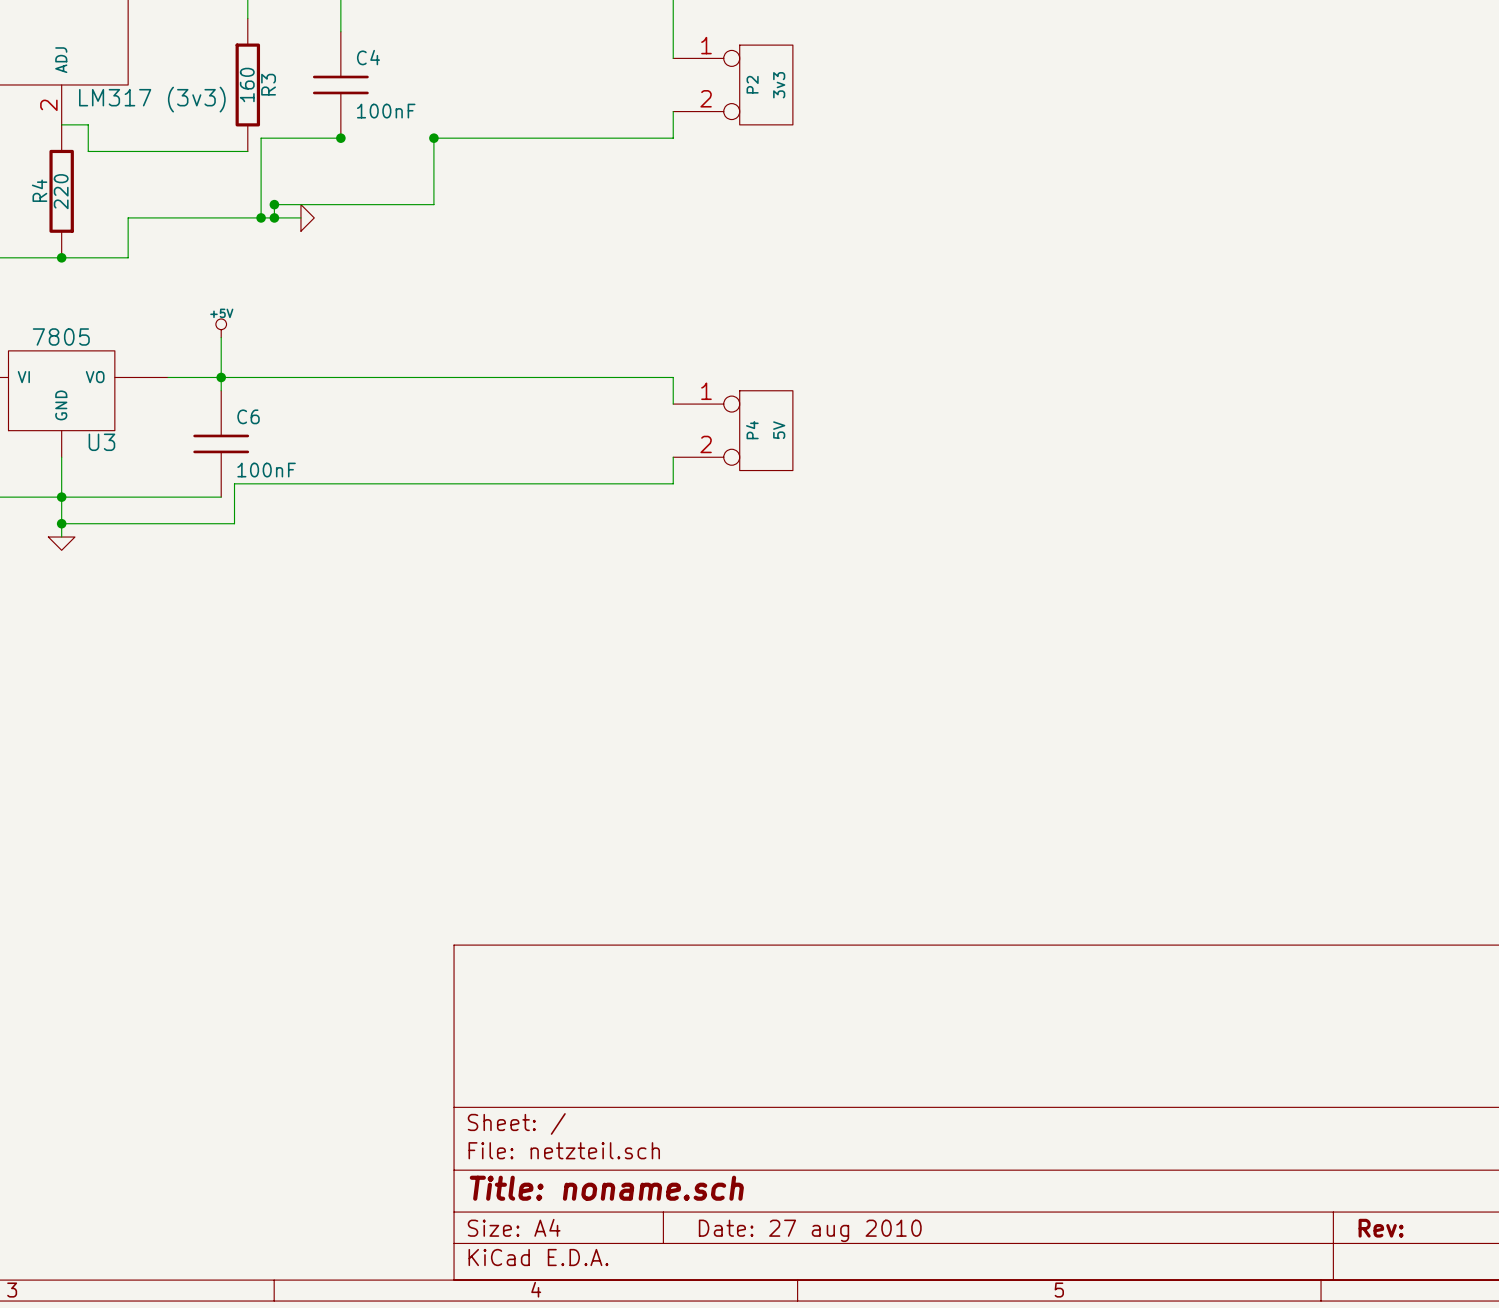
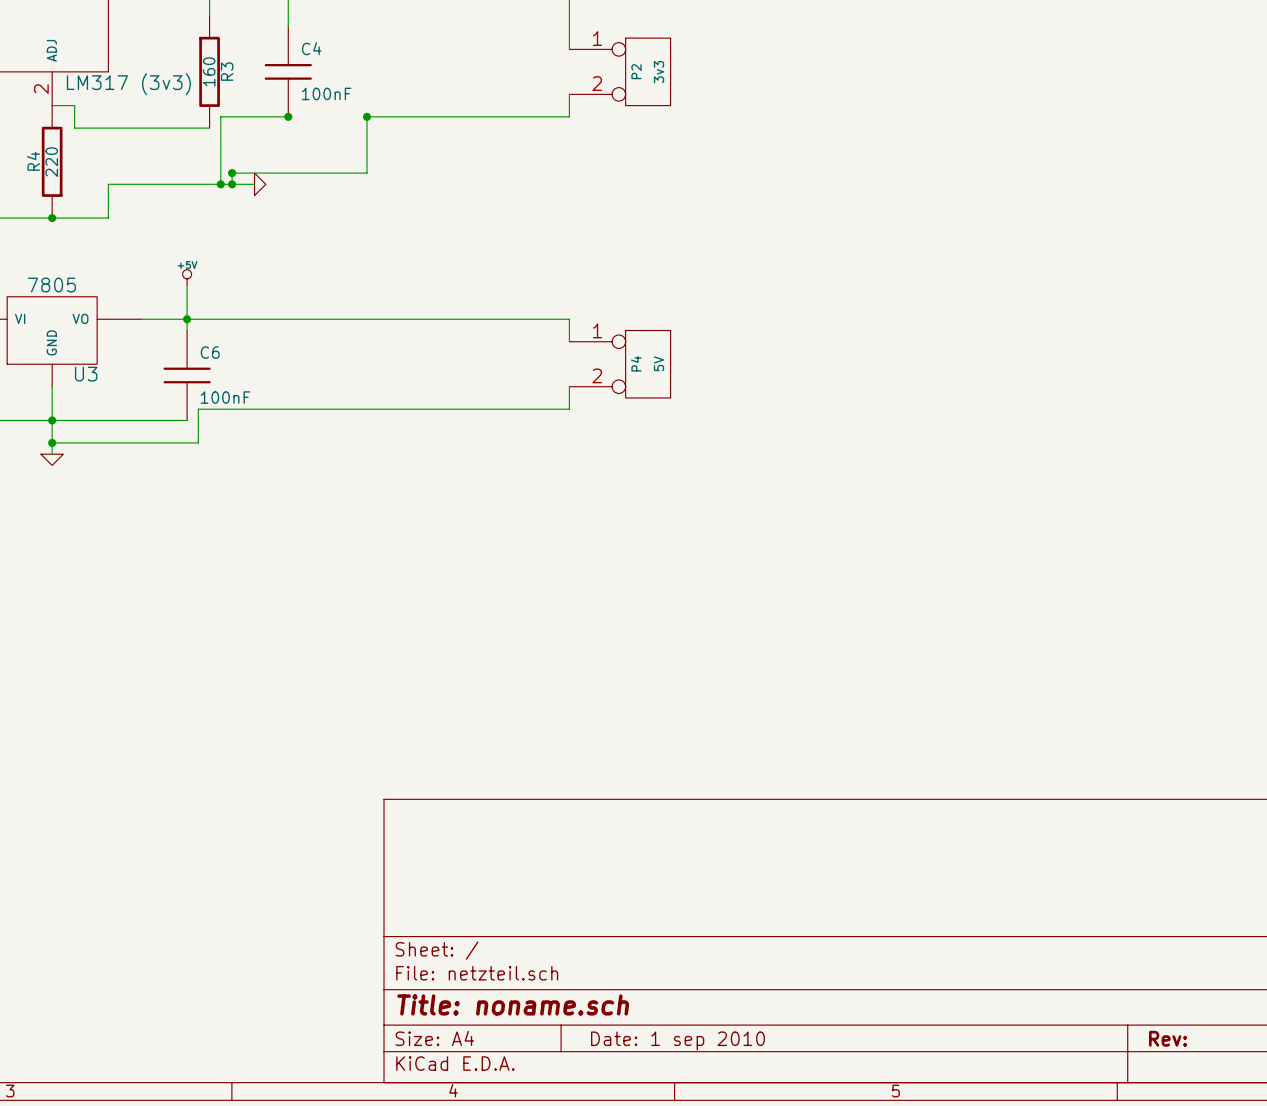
title block: Date: 27 aug 2010 (810, 1230) -> Date: 1 sep 2010 (678, 1040)

